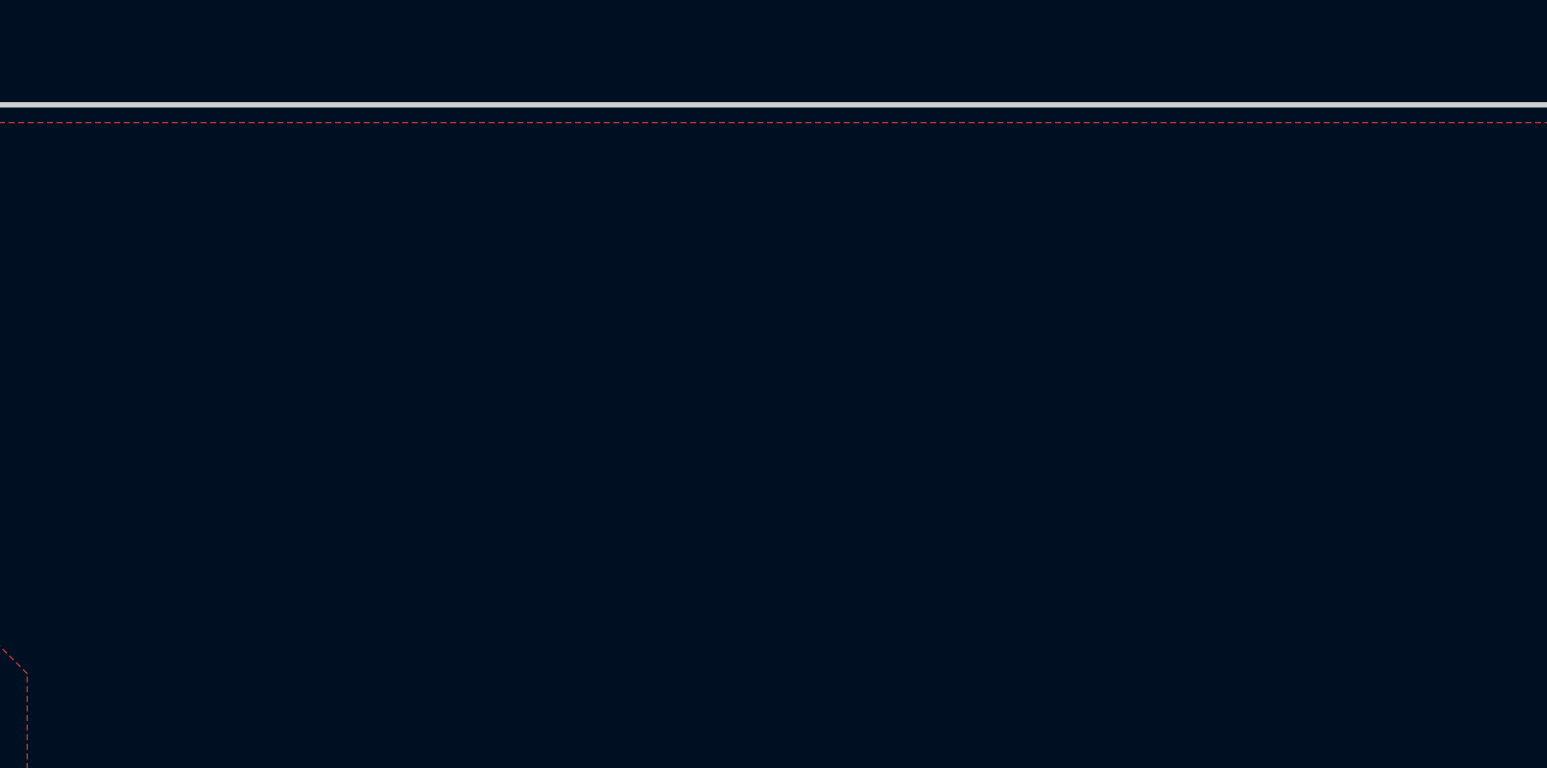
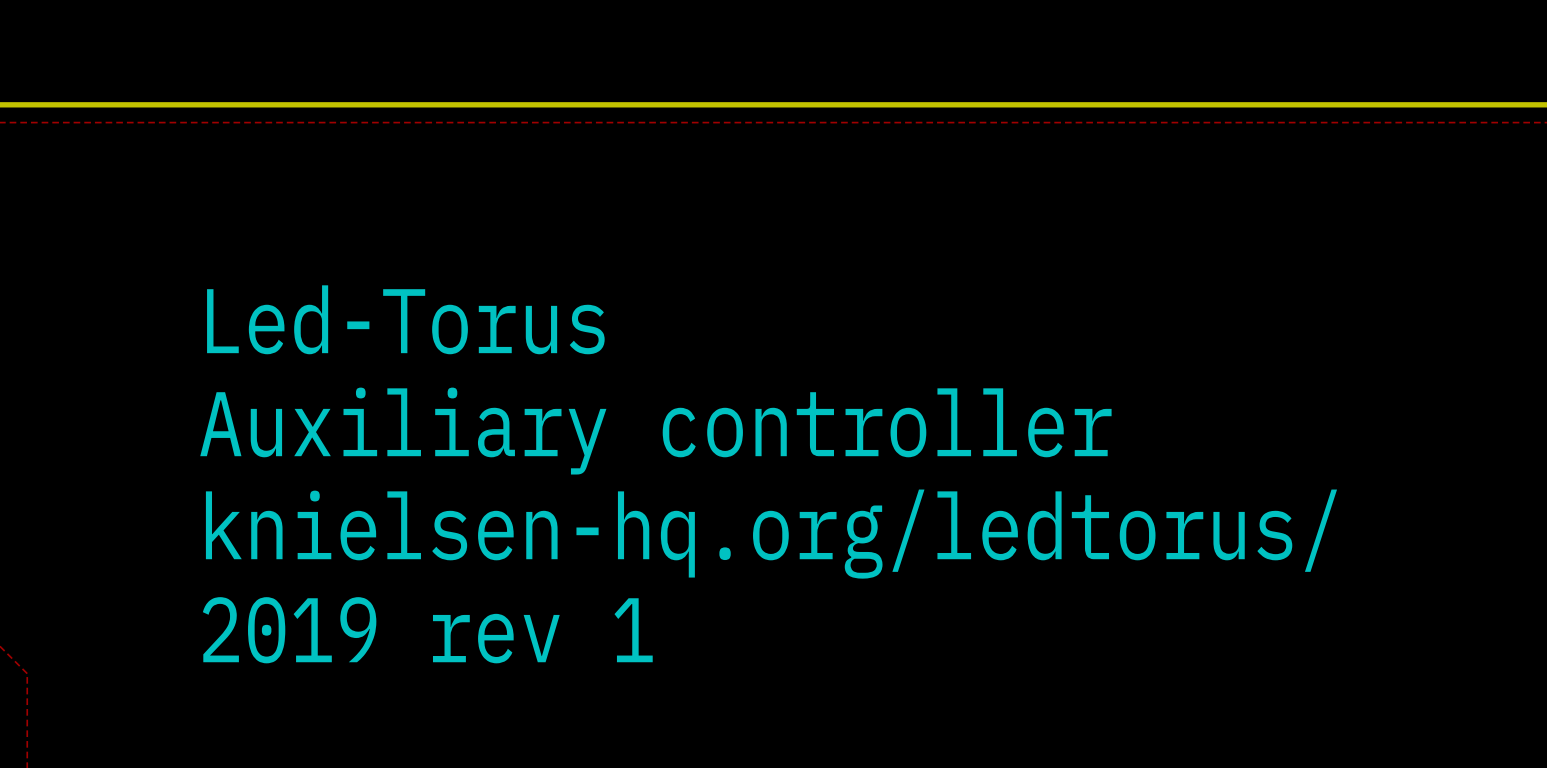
text: none -> Led-Torus (405, 319)
text: none -> Auxiliary controller (655, 431)
text: none -> knielsen-hq.org/ledtorus/ (771, 534)
text: none -> 2019 rev 1 (427, 630)

